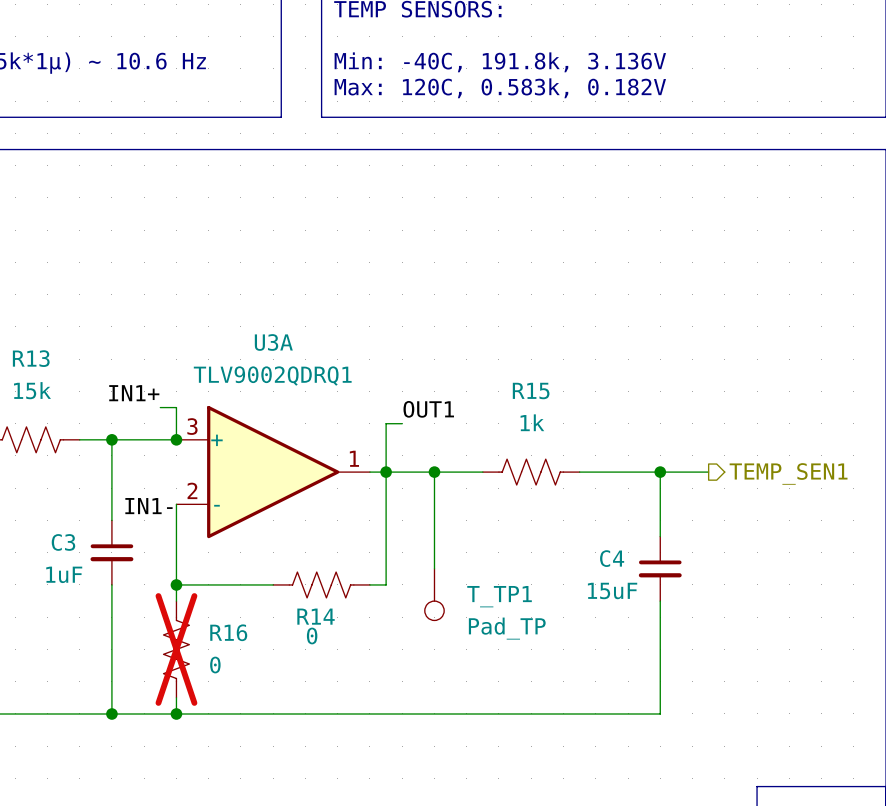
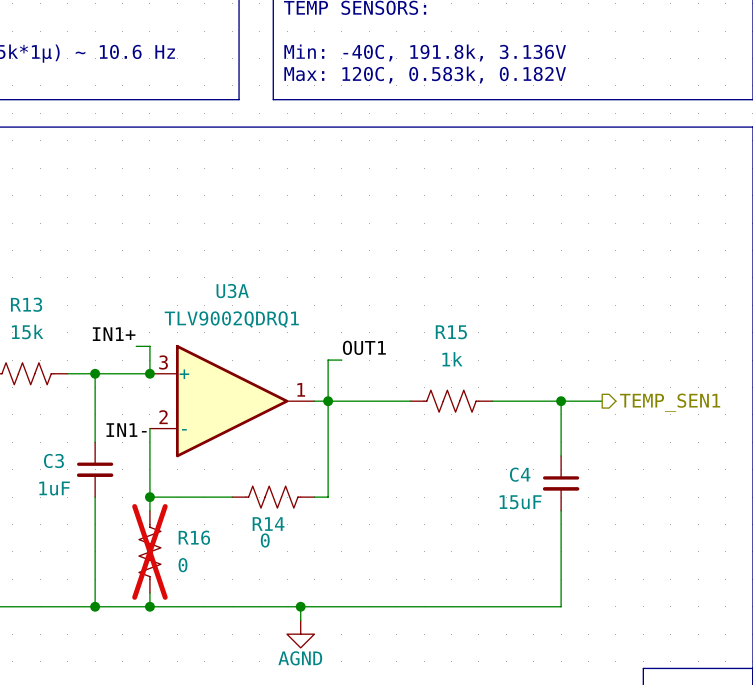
wire: (434, 472) (434, 568) -> none
junction: (434, 472) -> none
T_TP1: Pad_TP (434, 594) -> none
wire: none -> (300, 606) (300, 620)
junction: none -> (300, 606)
power symbol: none -> AGND (300, 634)

